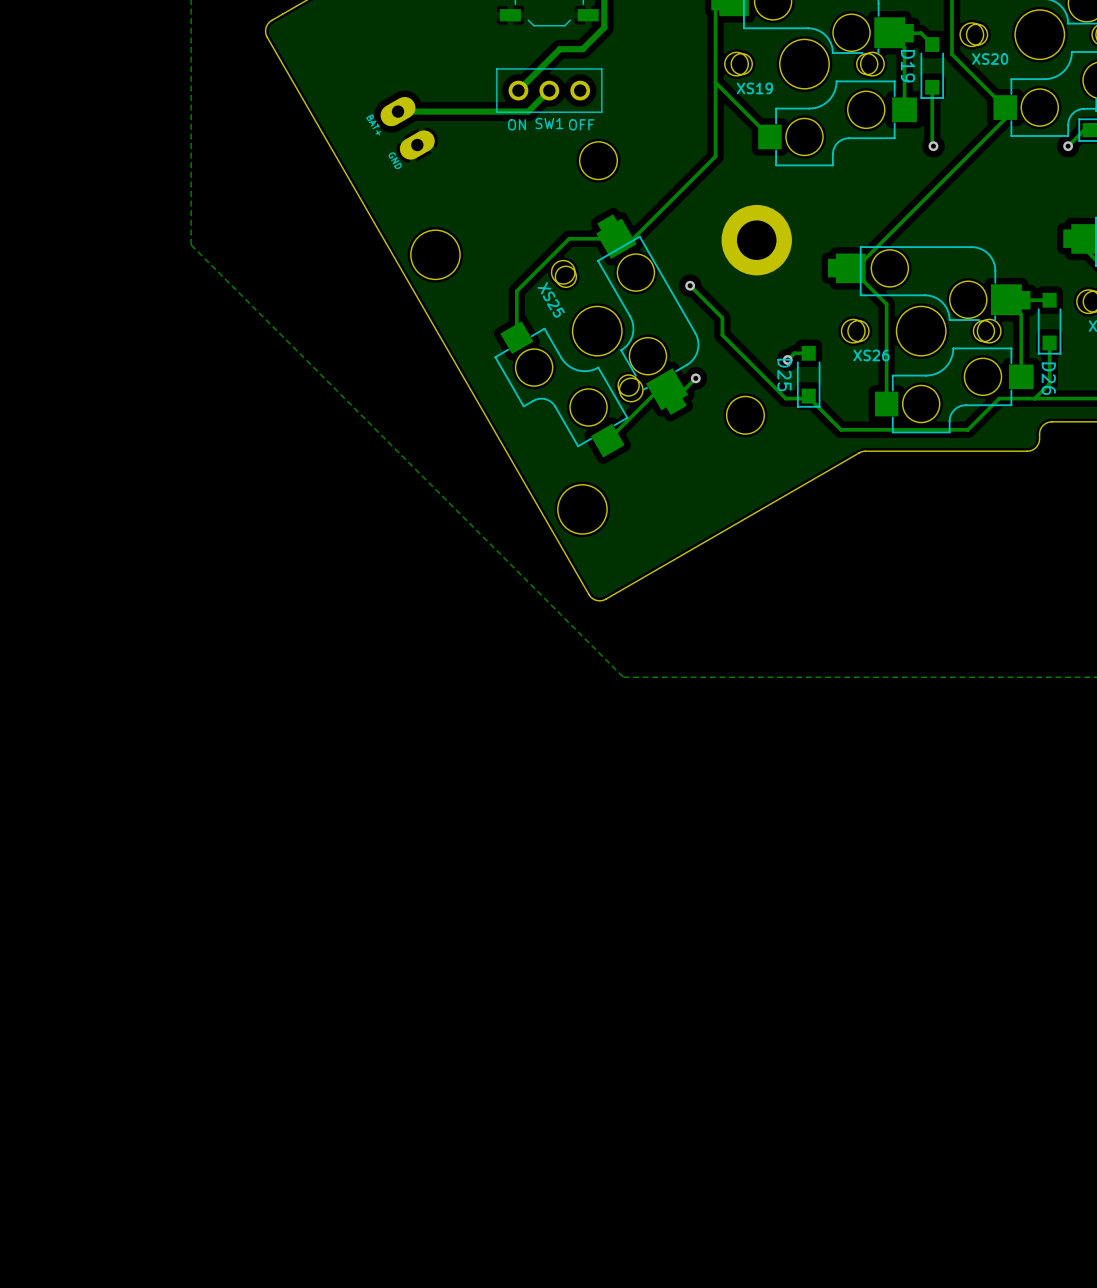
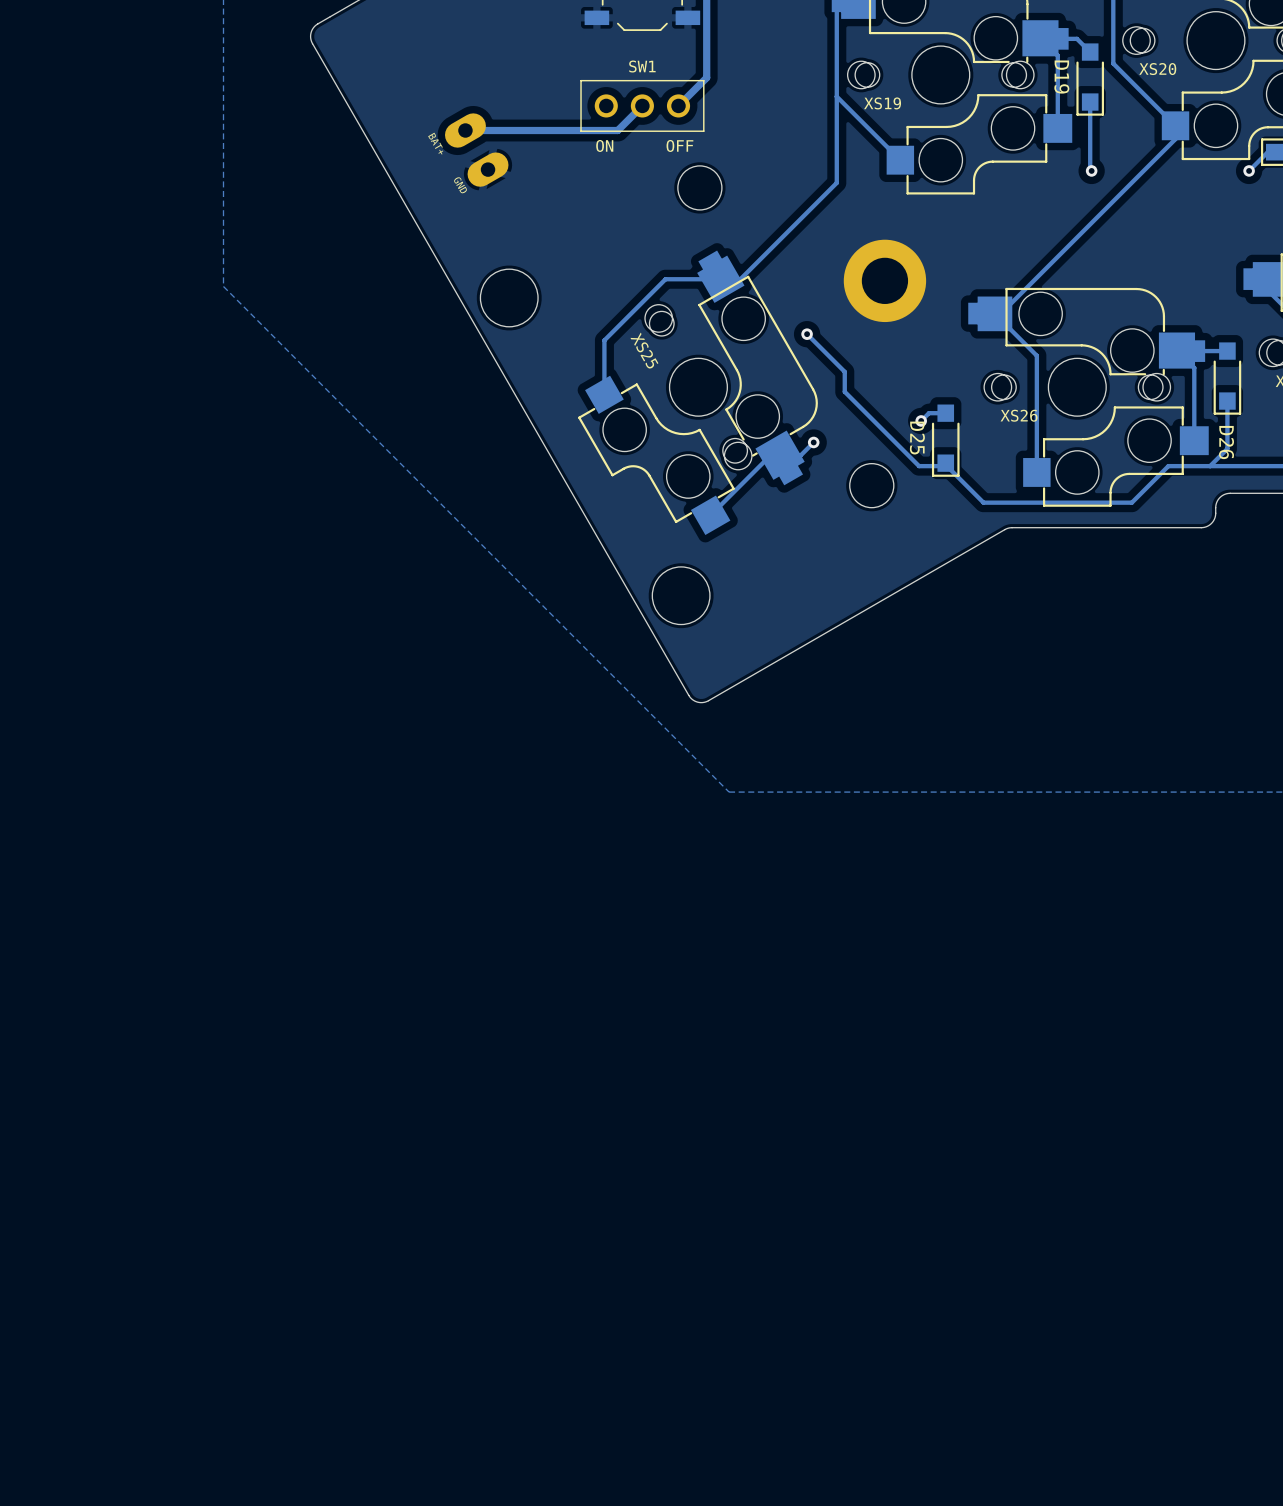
track: (604, 27) (582, 49) (559, 49) (518, 90) -> (706, 32) (706, 77) (678, 105)
SW1 name position: SW1 (549, 123) -> SW1 (642, 66)

